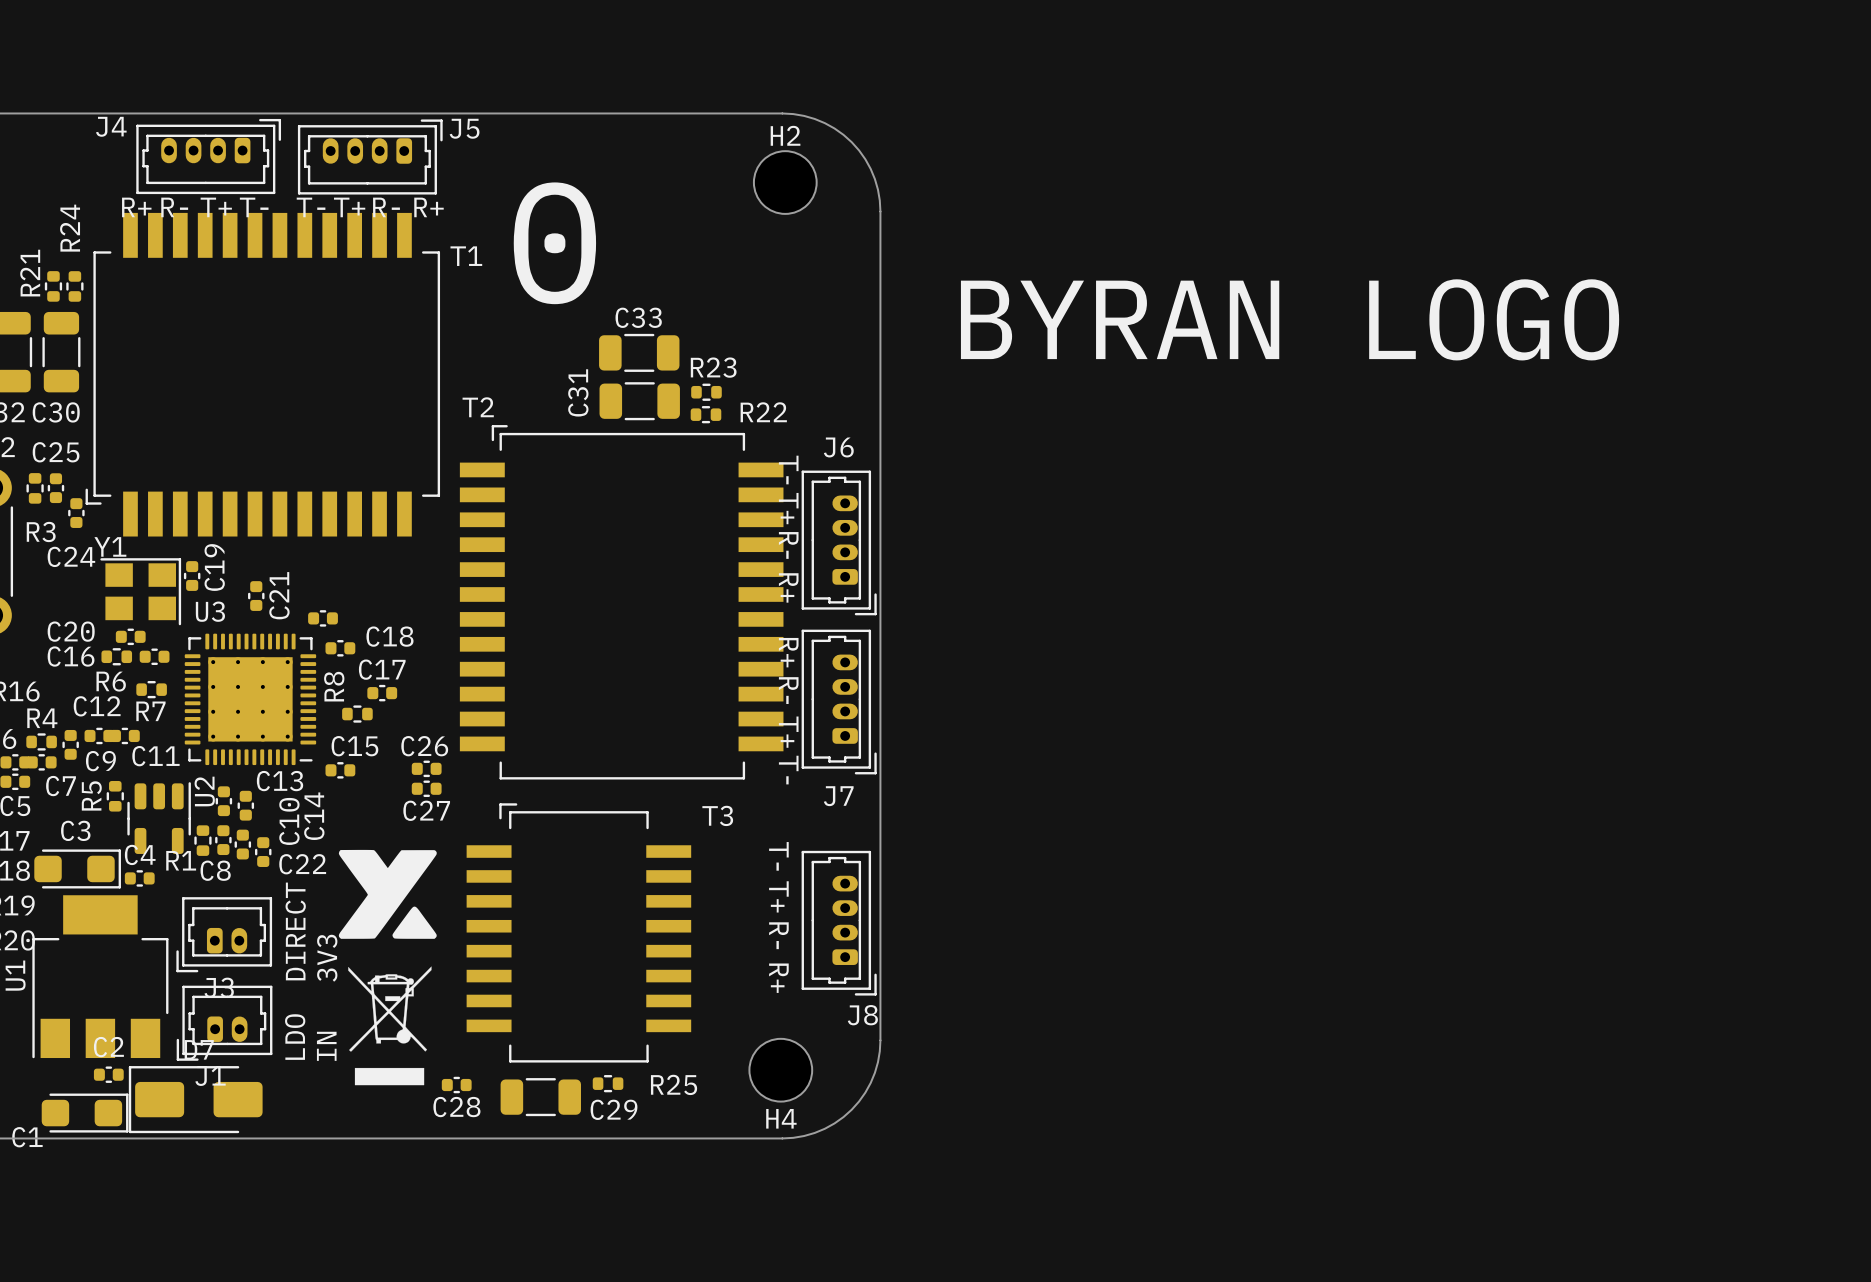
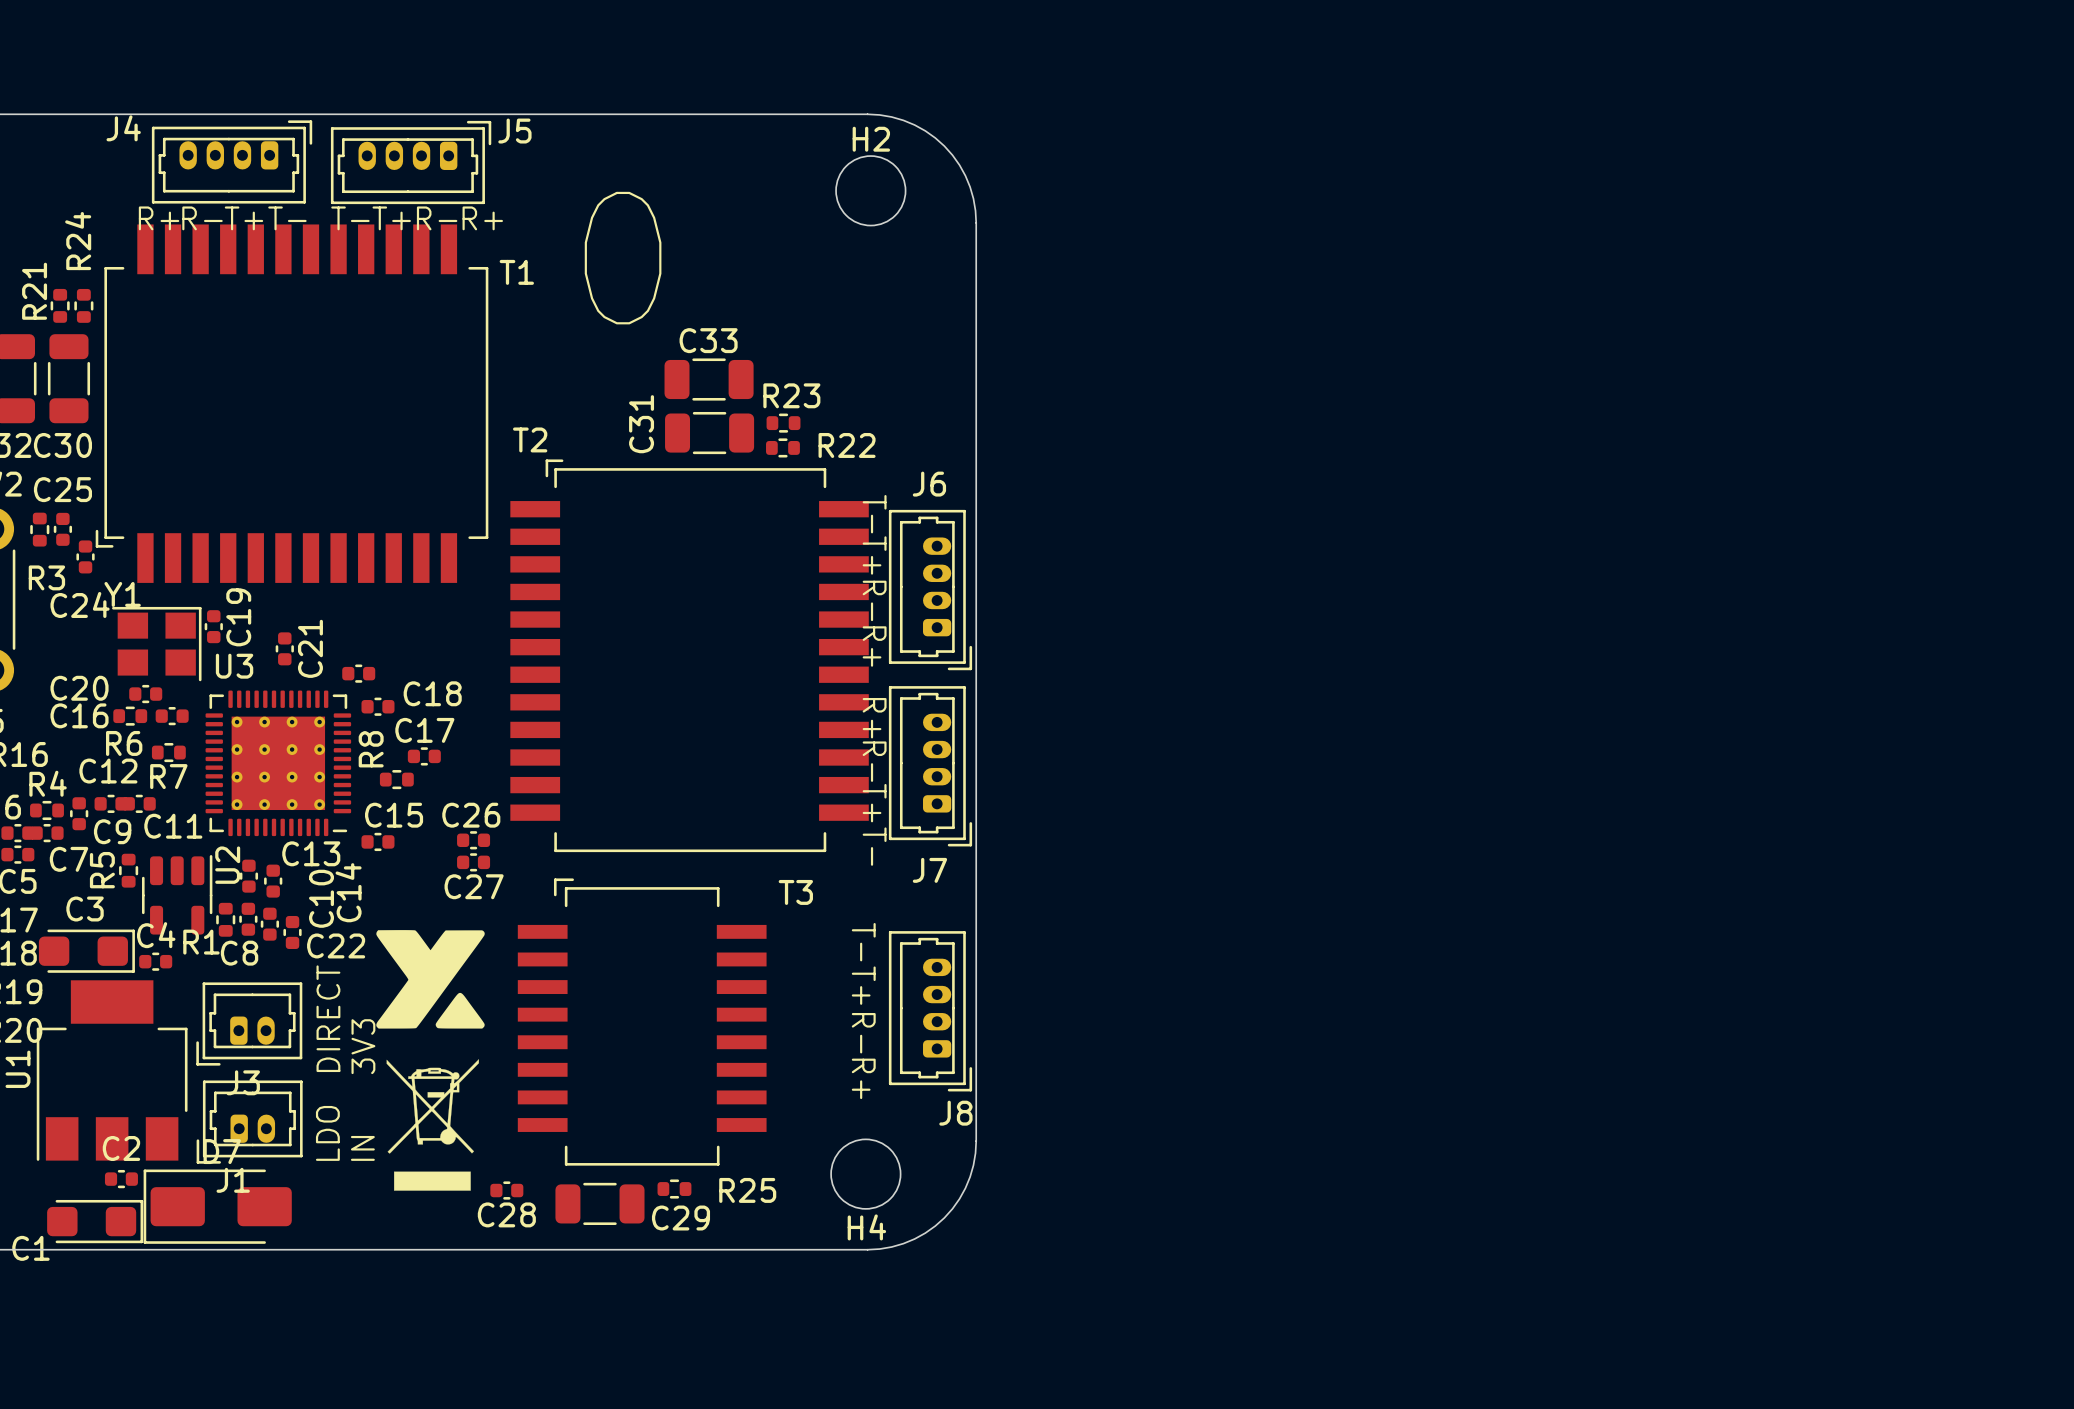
text: BYRAN LOGO (1290, 319) -> none

